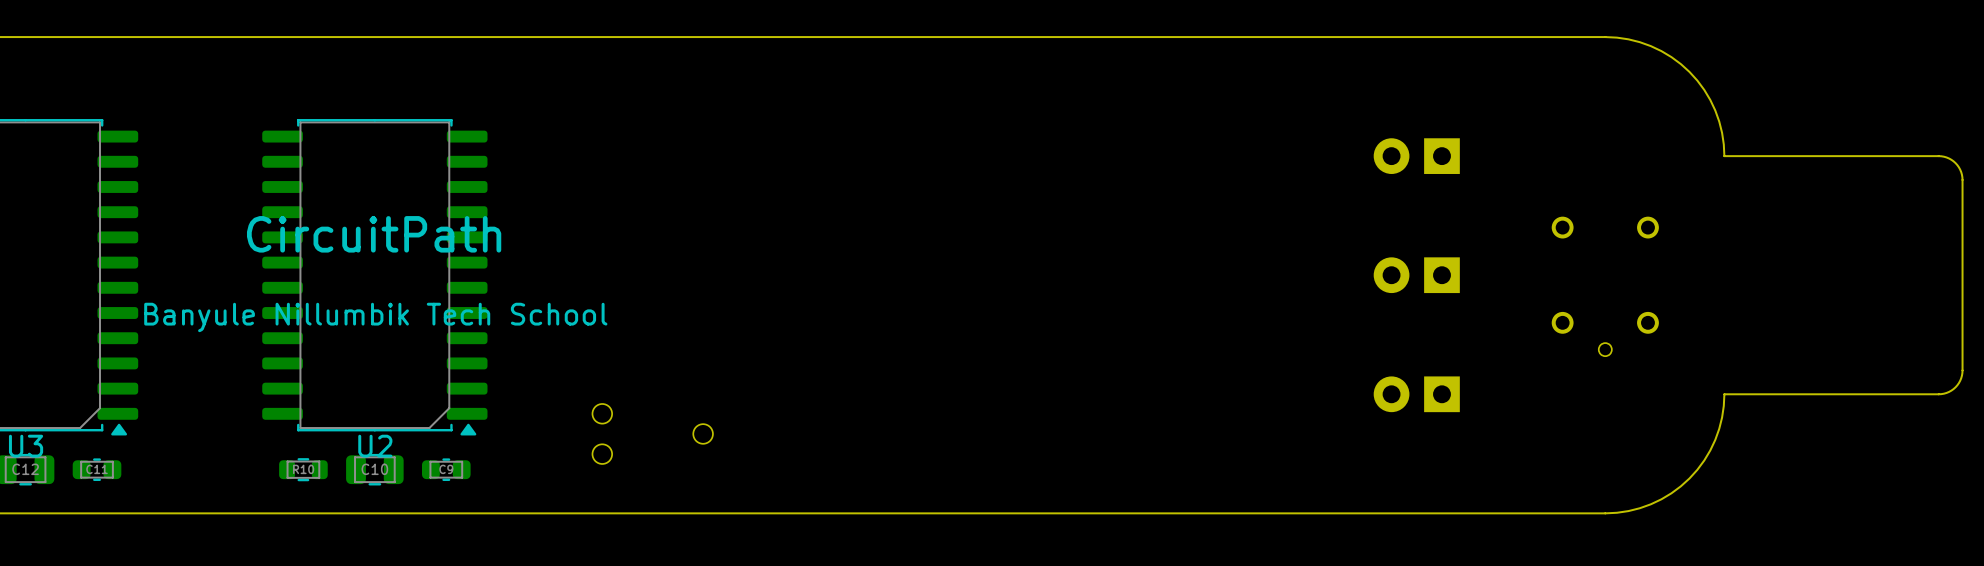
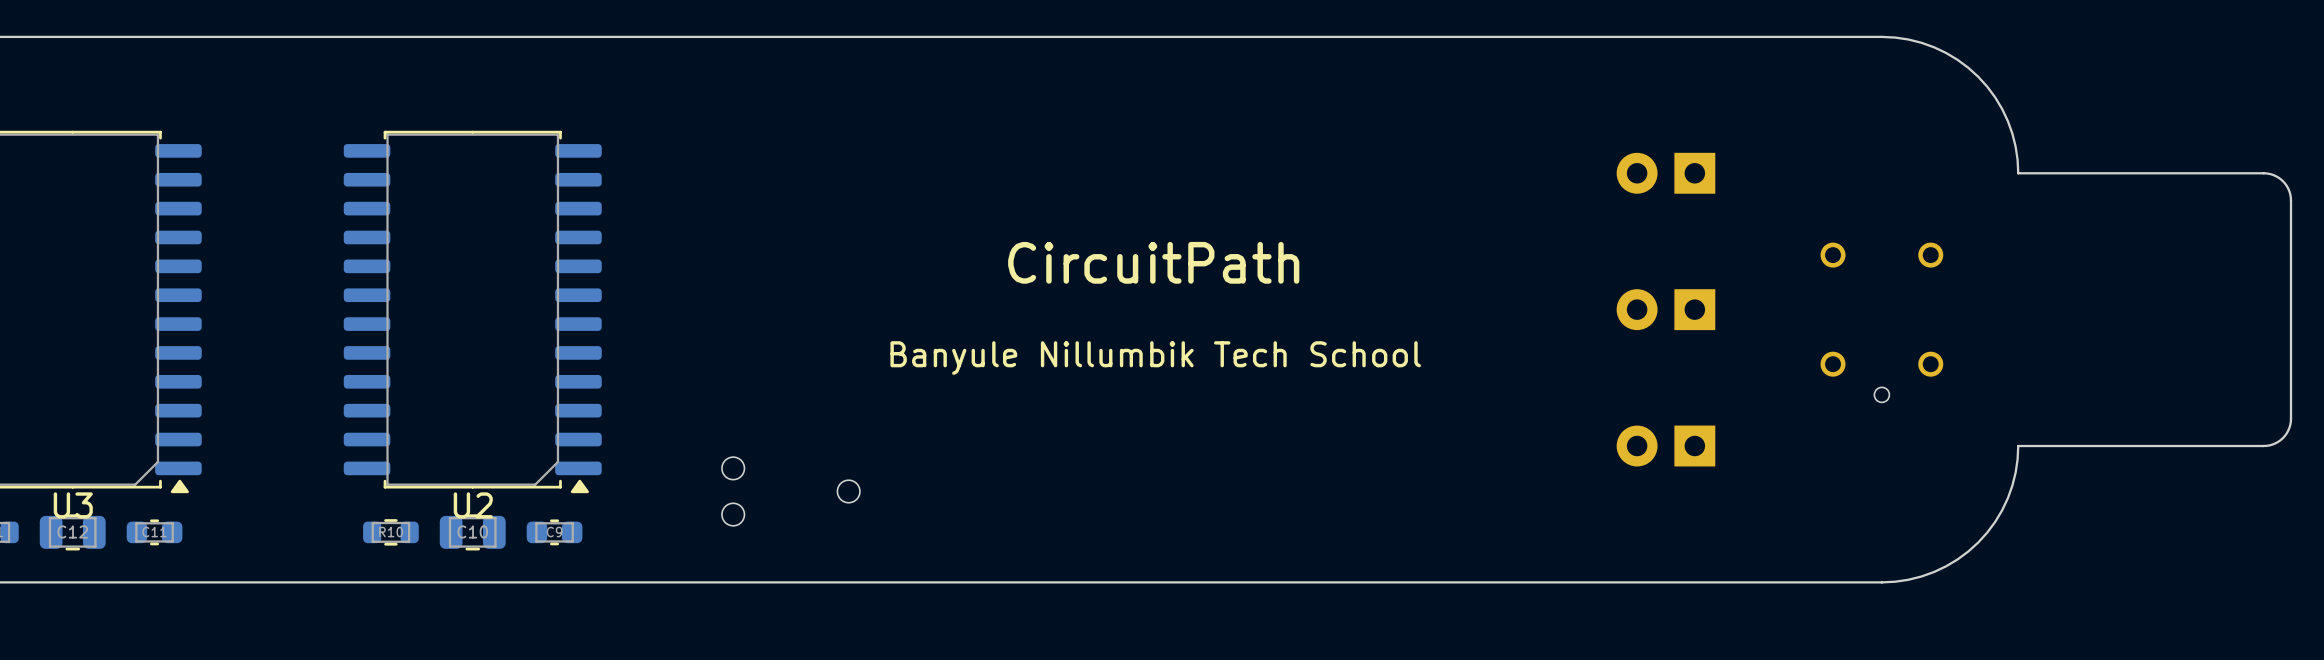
text: CircuitPath (374, 234) -> none
text: none -> CircuitPath (1153, 262)
text: Banyule Nillumbik Tech School (375, 317) -> none
text: none -> Banyule Nillumbik Tech School (1155, 358)

